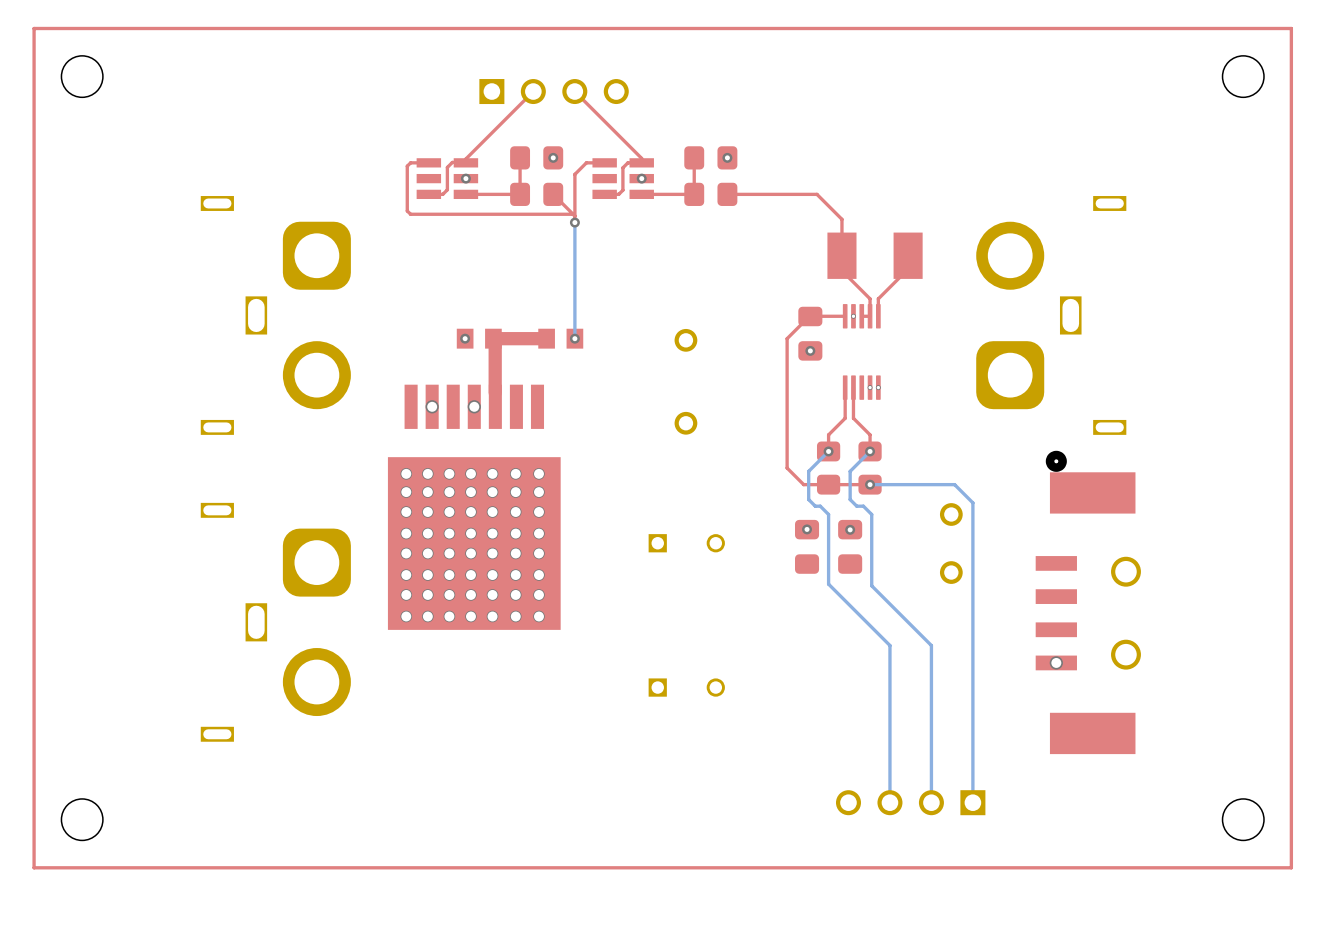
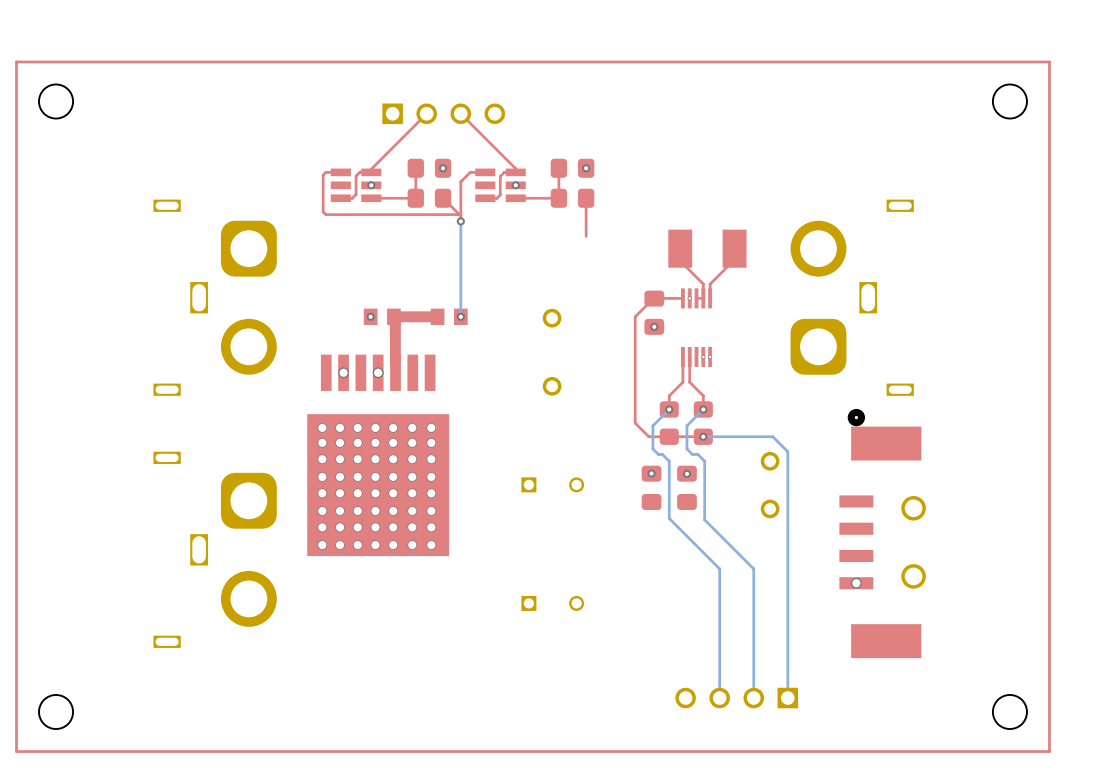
top track: (727, 194) (816, 194) (841, 219) (841, 255) -> (586, 198) (586, 236)

